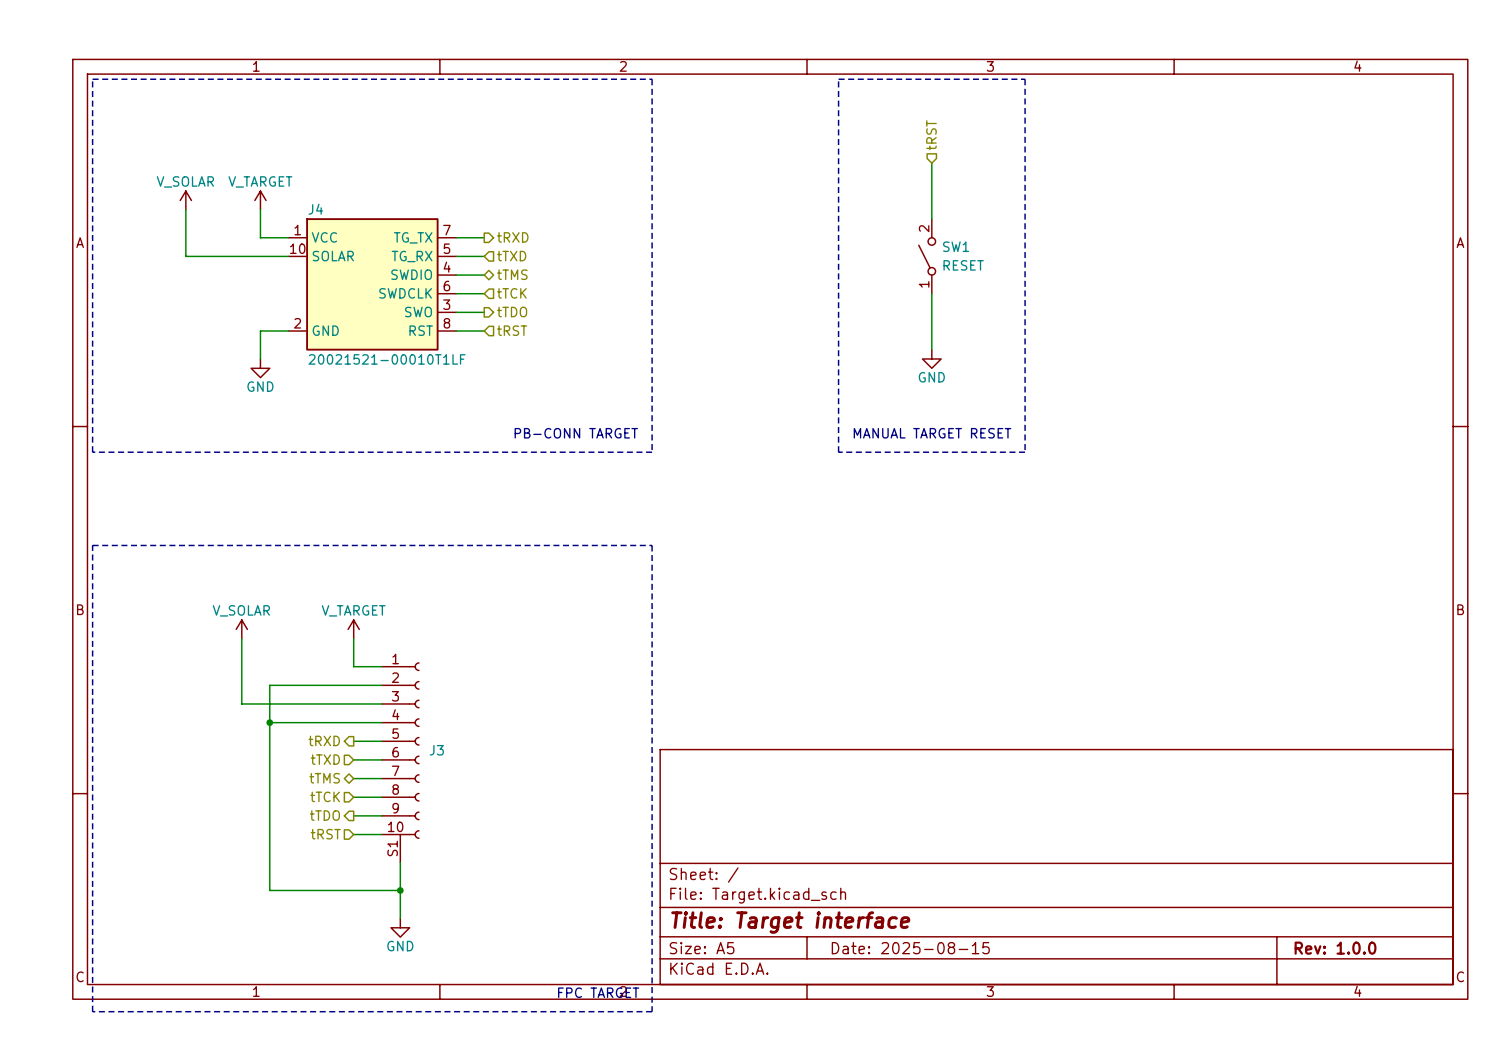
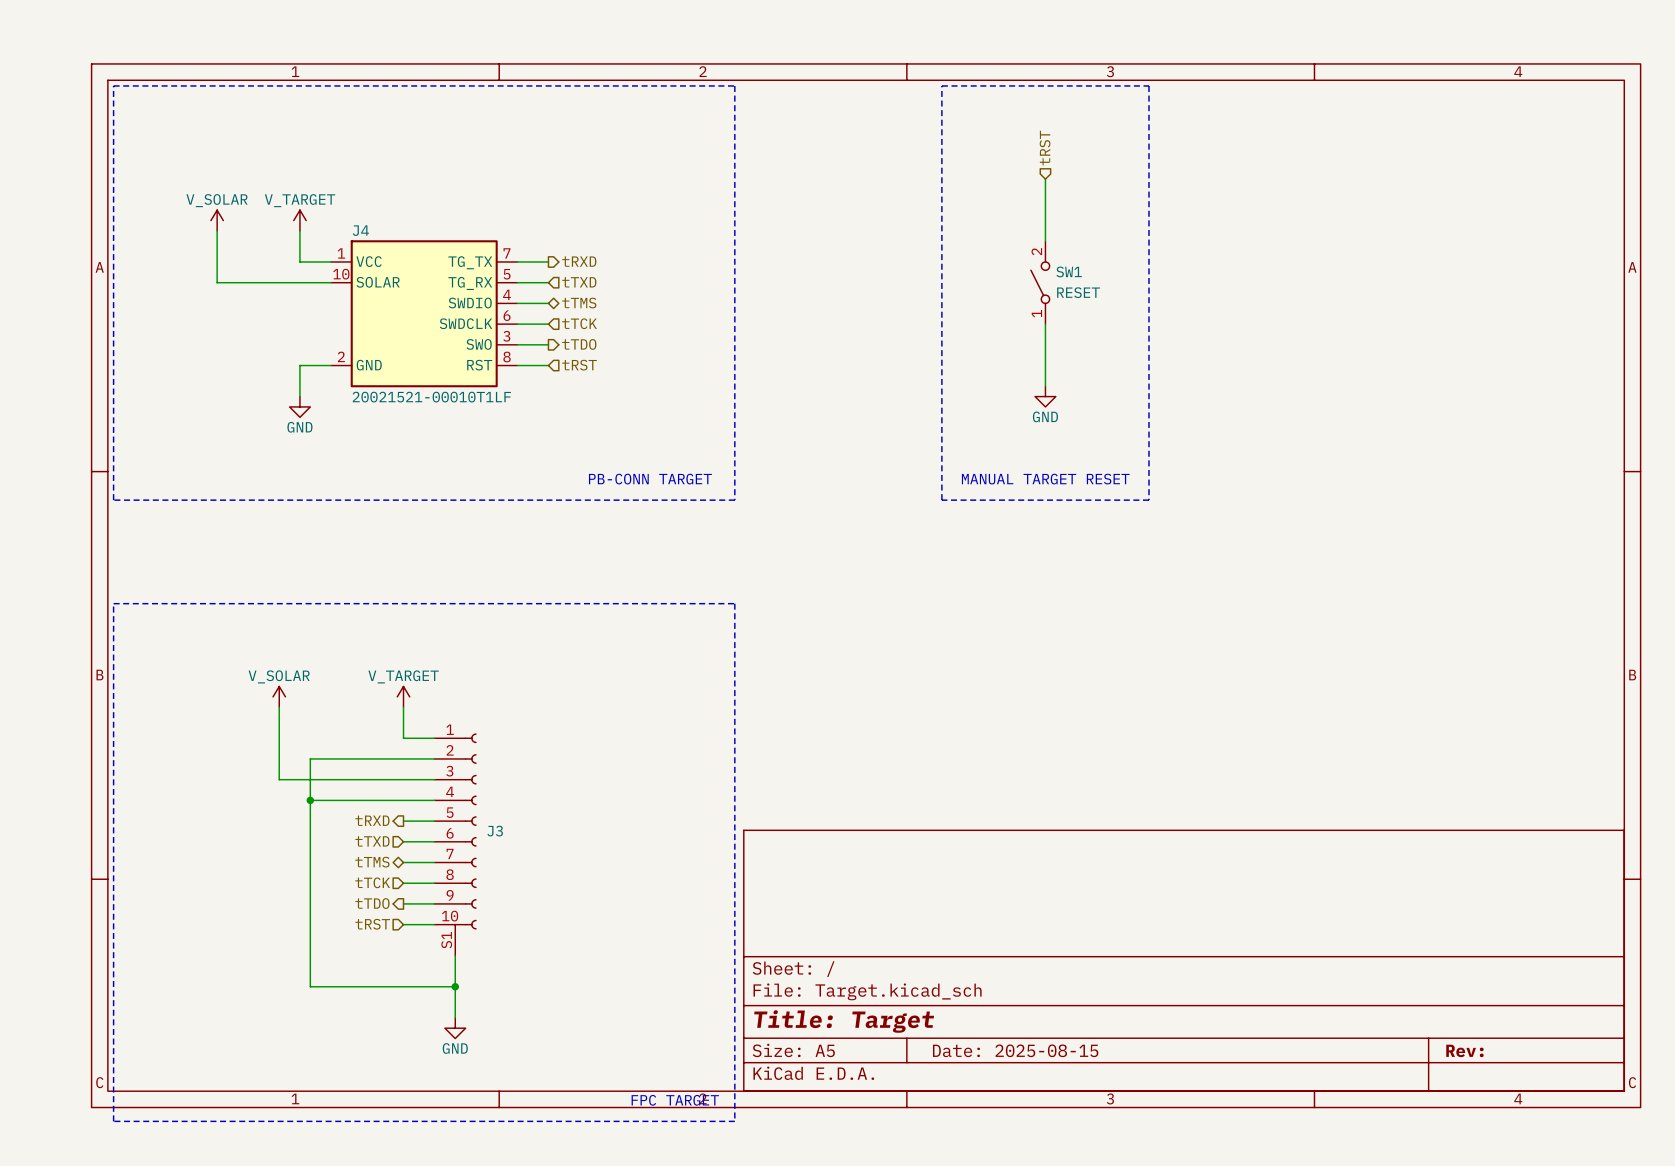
title block: Title: Target interface (790, 922) -> Title: Target (844, 1021)
title block: Rev: 1.0.0 (1335, 948) -> Rev: (1464, 1050)

